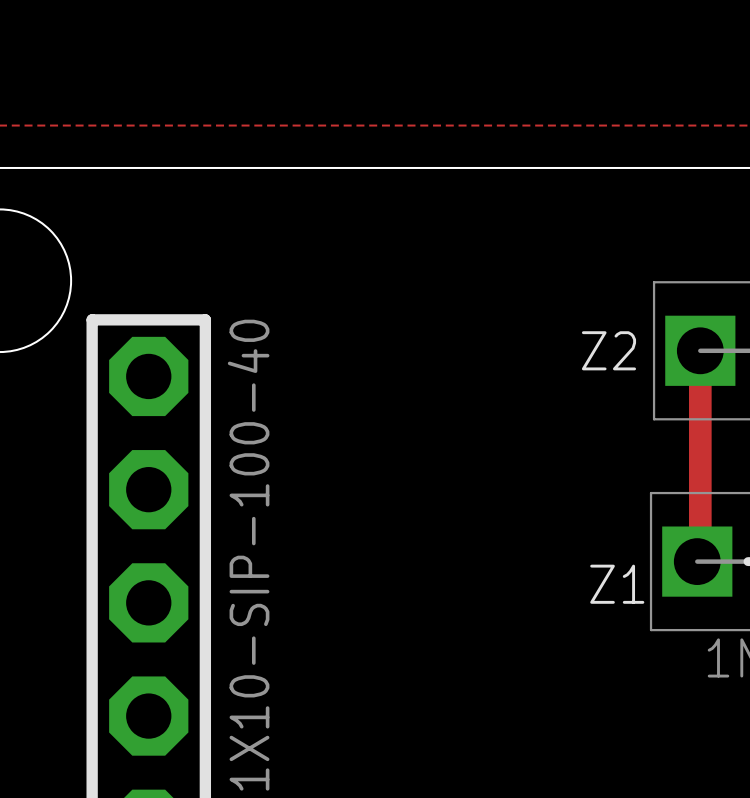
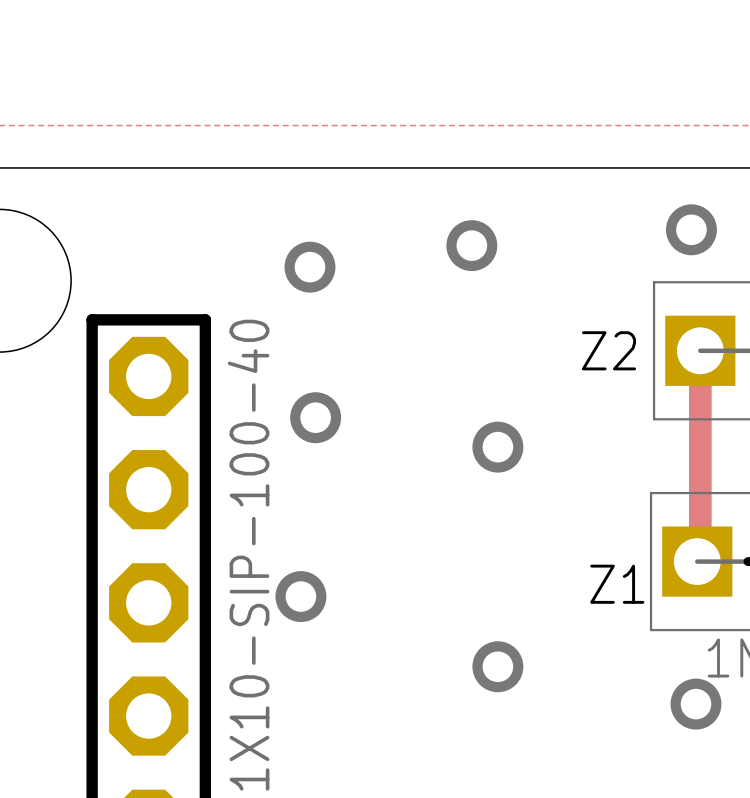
via: none -> (691, 229)
via: none -> (471, 245)
via: none -> (309, 267)
via: none -> (315, 417)
via: none -> (497, 447)
via: none -> (300, 596)
via: none -> (497, 666)
via: none -> (695, 704)

